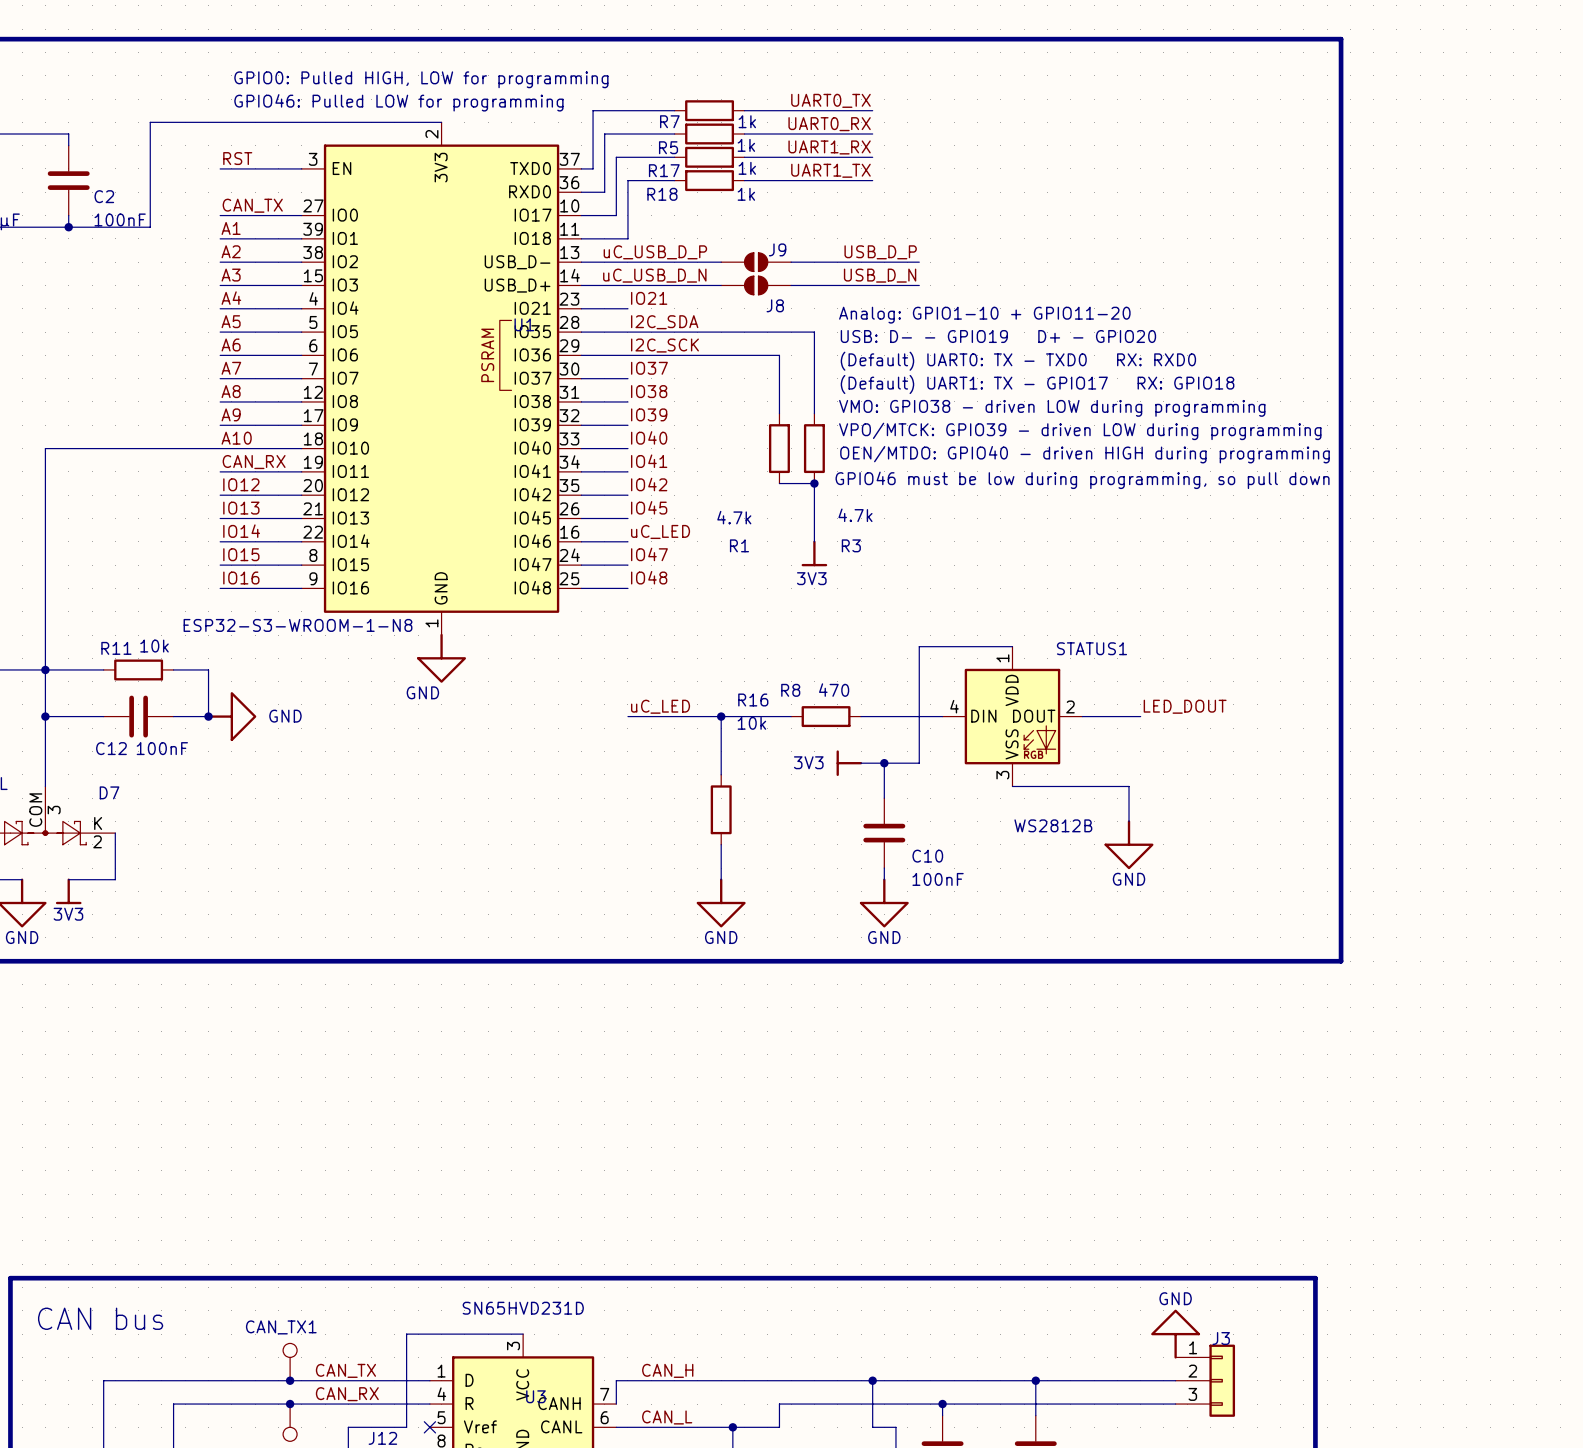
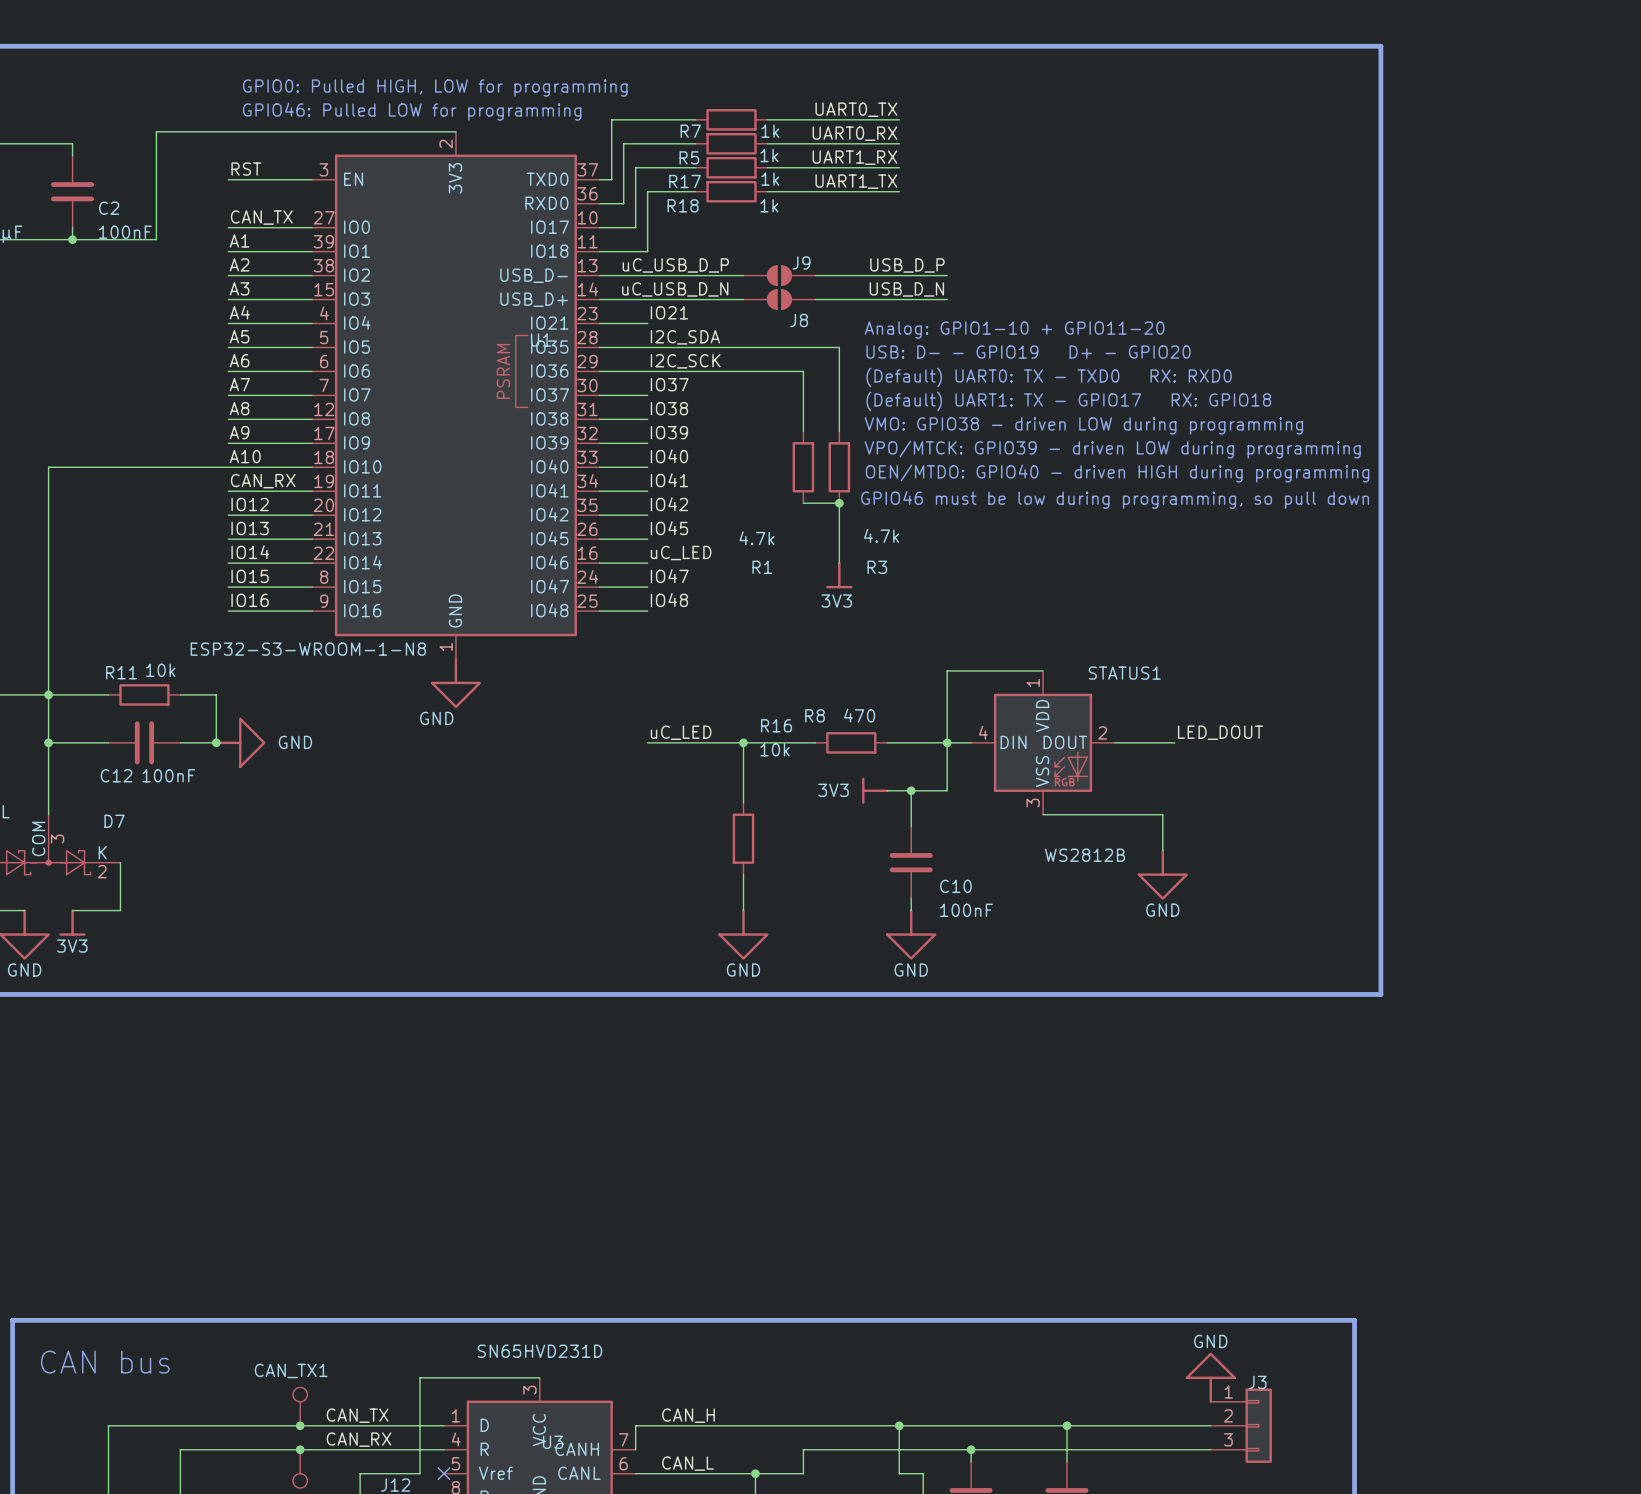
junction: none -> (947, 742)

